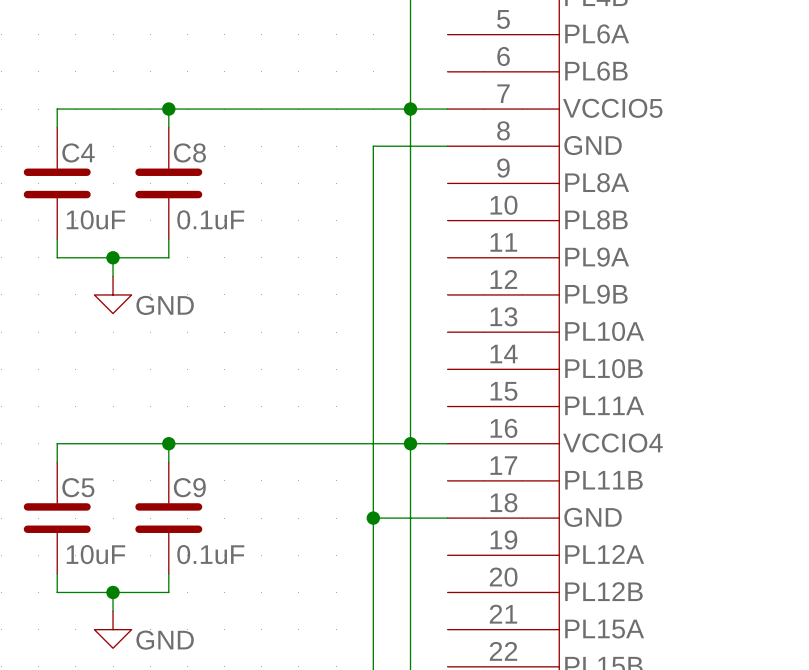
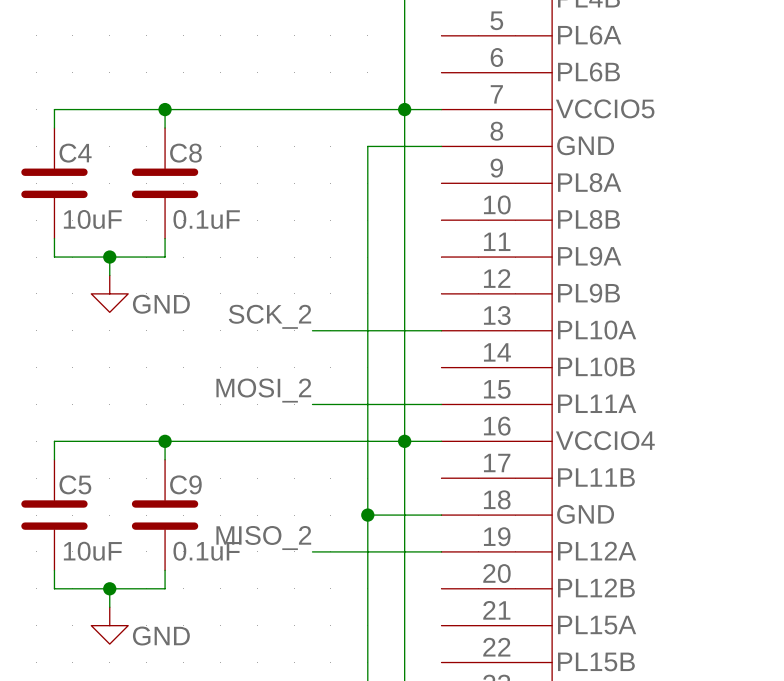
label: none -> SCK_2 (269, 316)
wire: none -> (312, 330) (441, 330)
label: none -> MOSI_2 (263, 390)
wire: none -> (312, 404) (441, 404)
label: none -> MISO_2 (263, 538)
wire: none -> (312, 551) (441, 551)

